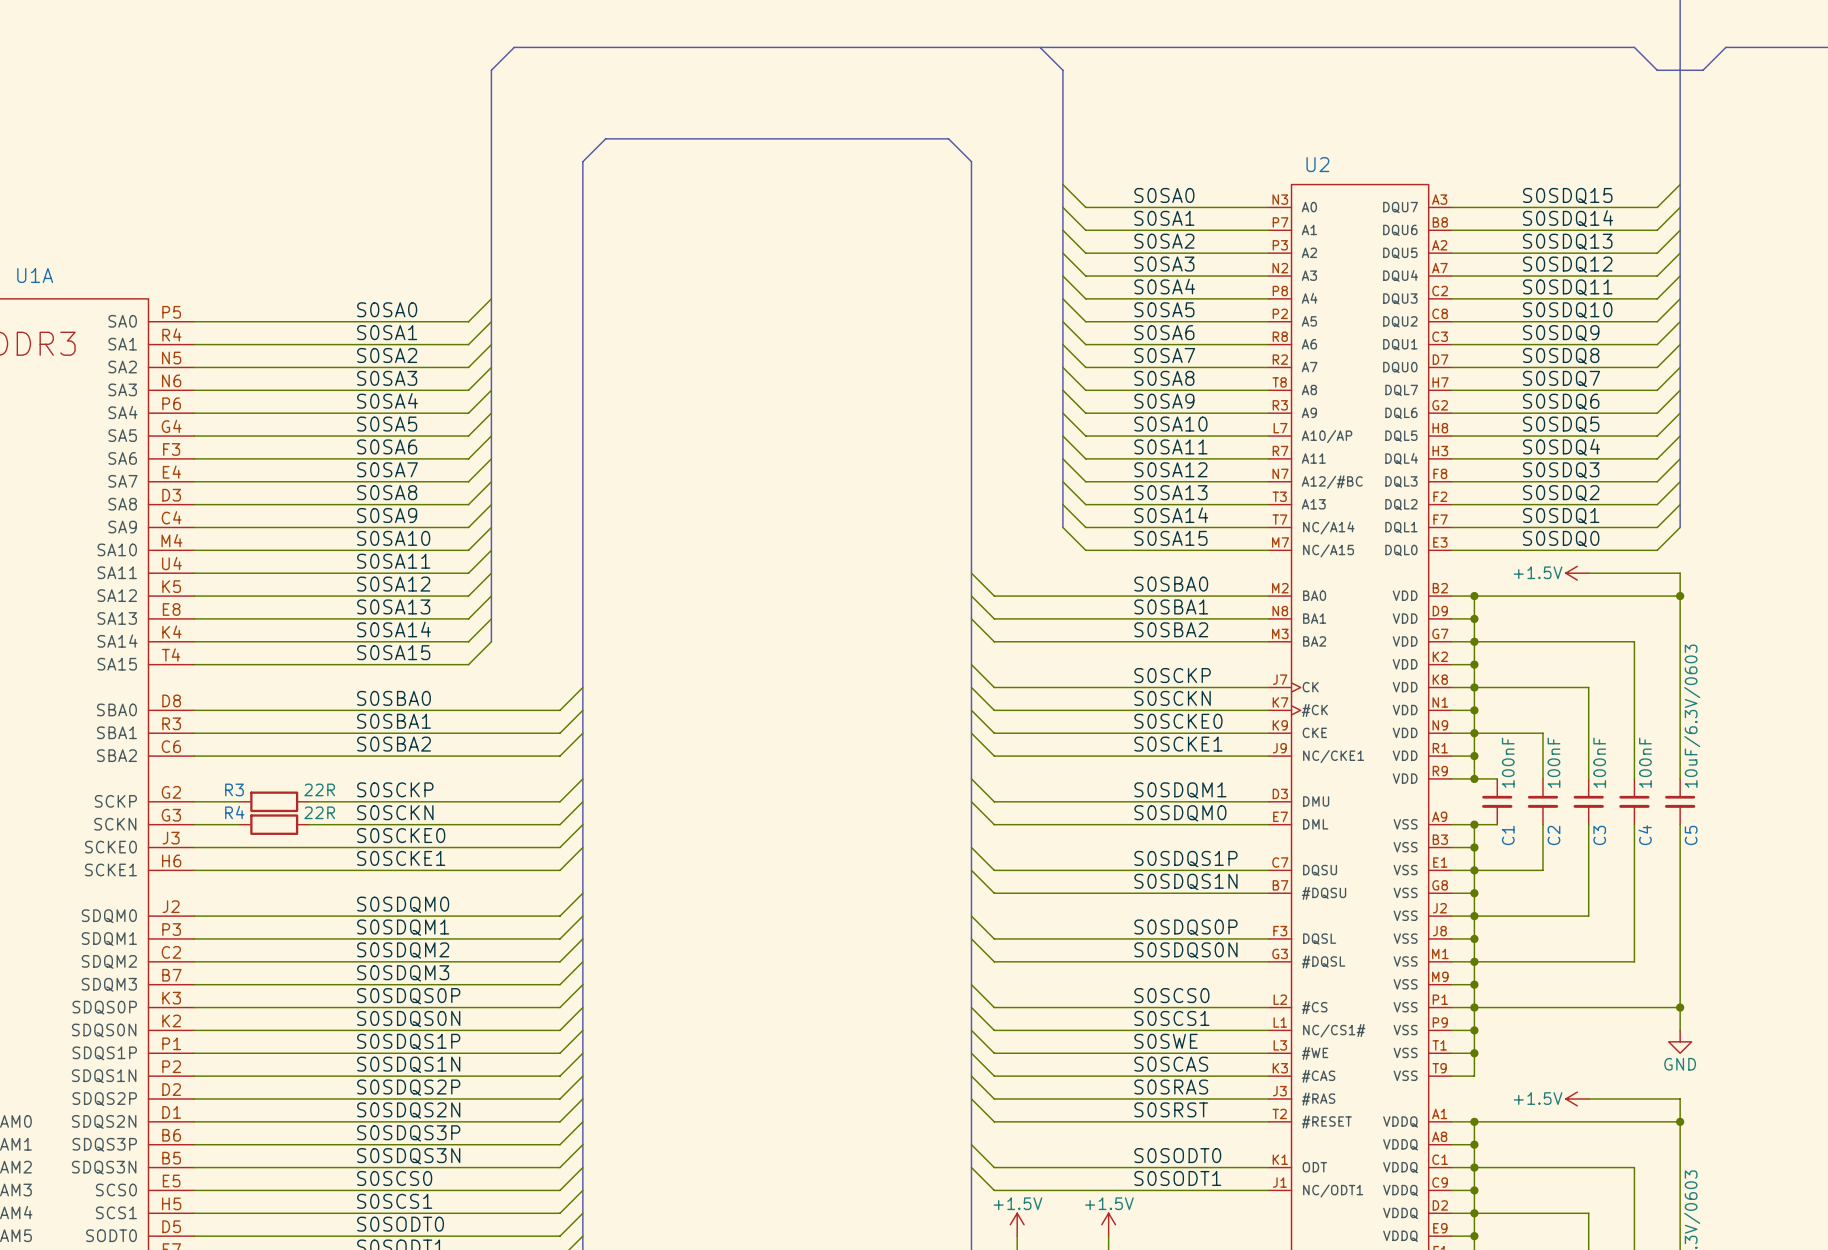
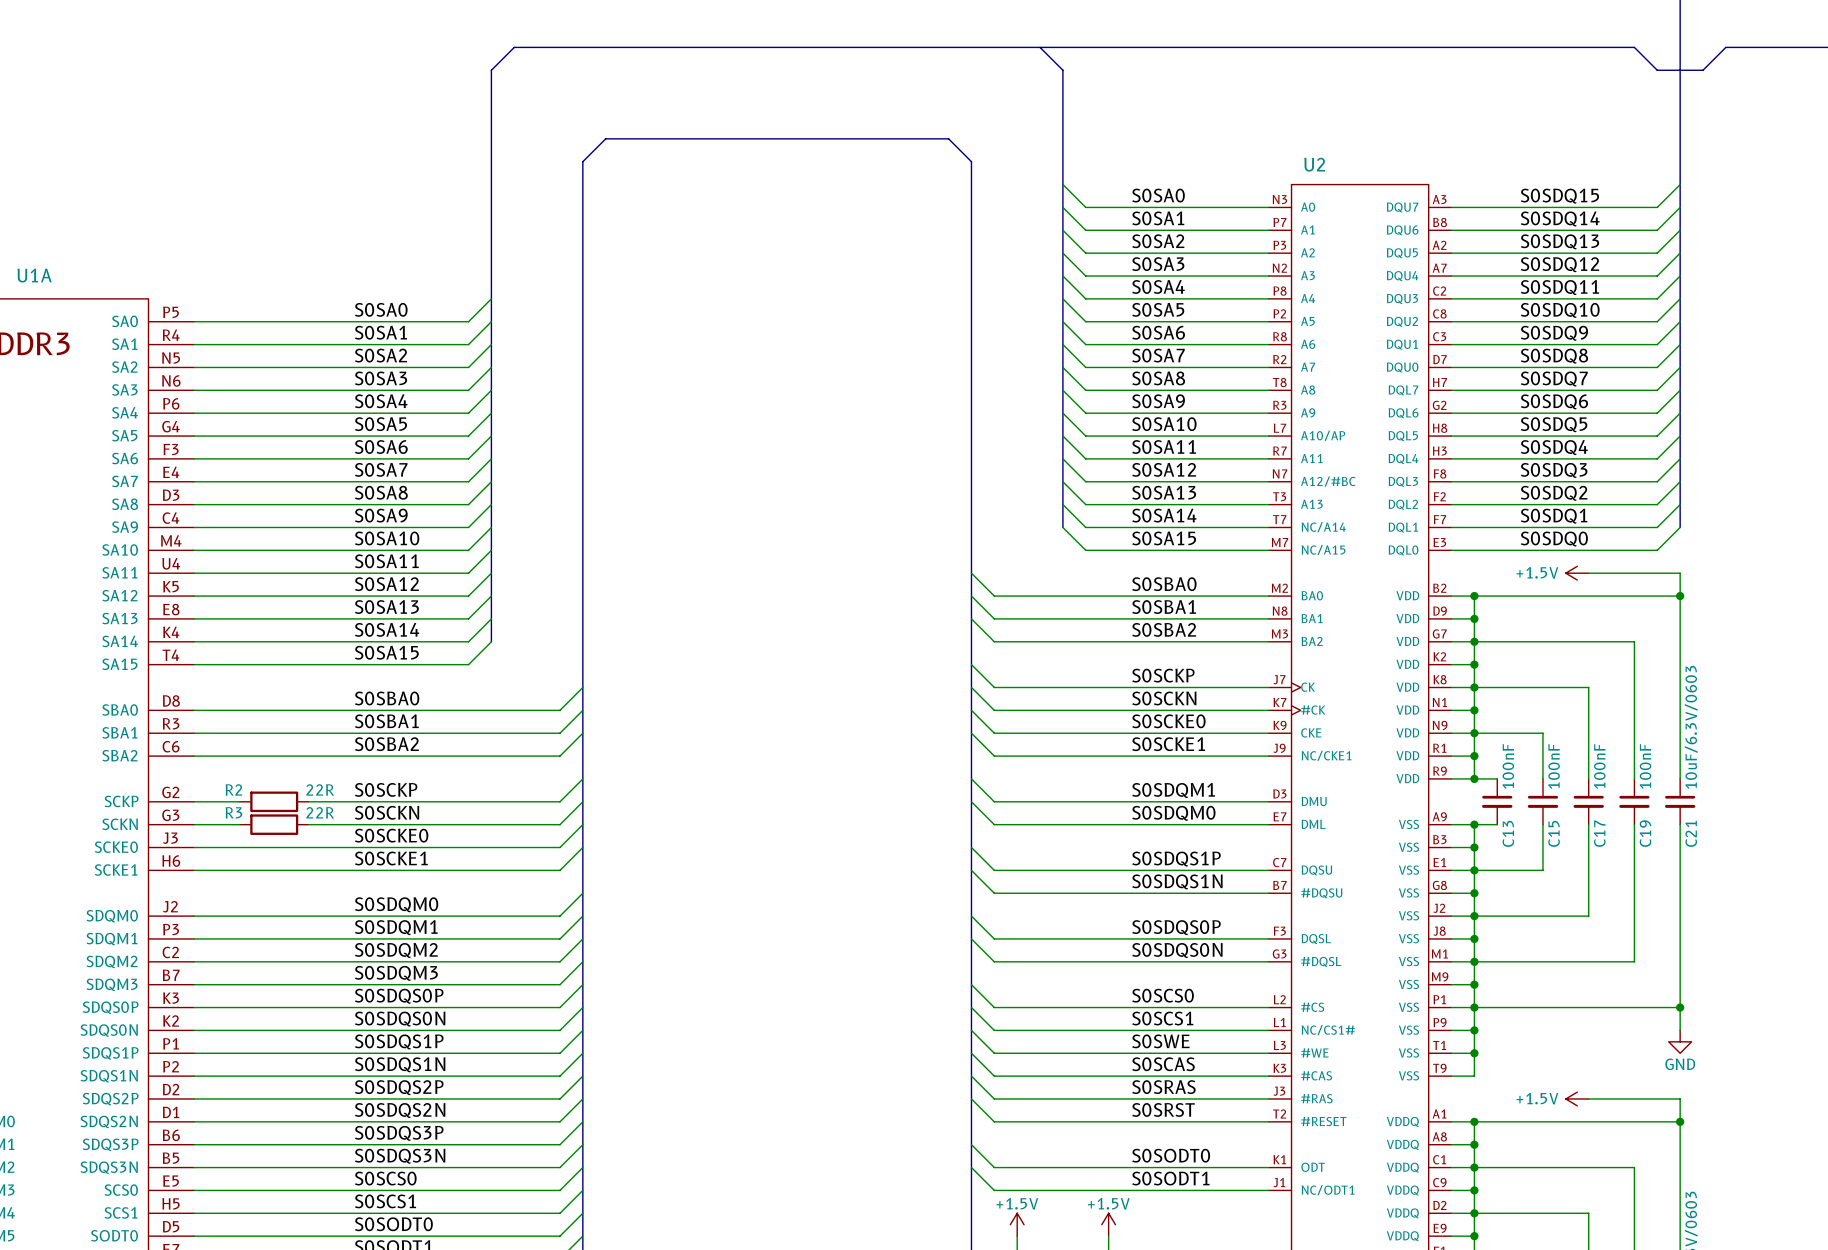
R3 name: R3 (234, 789) -> R2 (233, 789)
R4 name: R4 (234, 812) -> R3 (233, 812)
C1 name: C1 (1508, 835) -> C13 (1508, 833)
C2 name: C2 (1553, 835) -> C15 (1554, 833)
C3 name: C3 (1599, 835) -> C17 (1599, 833)
C4 name: C4 (1645, 835) -> C19 (1645, 833)
C5 name: C5 (1691, 835) -> C21 (1691, 833)

